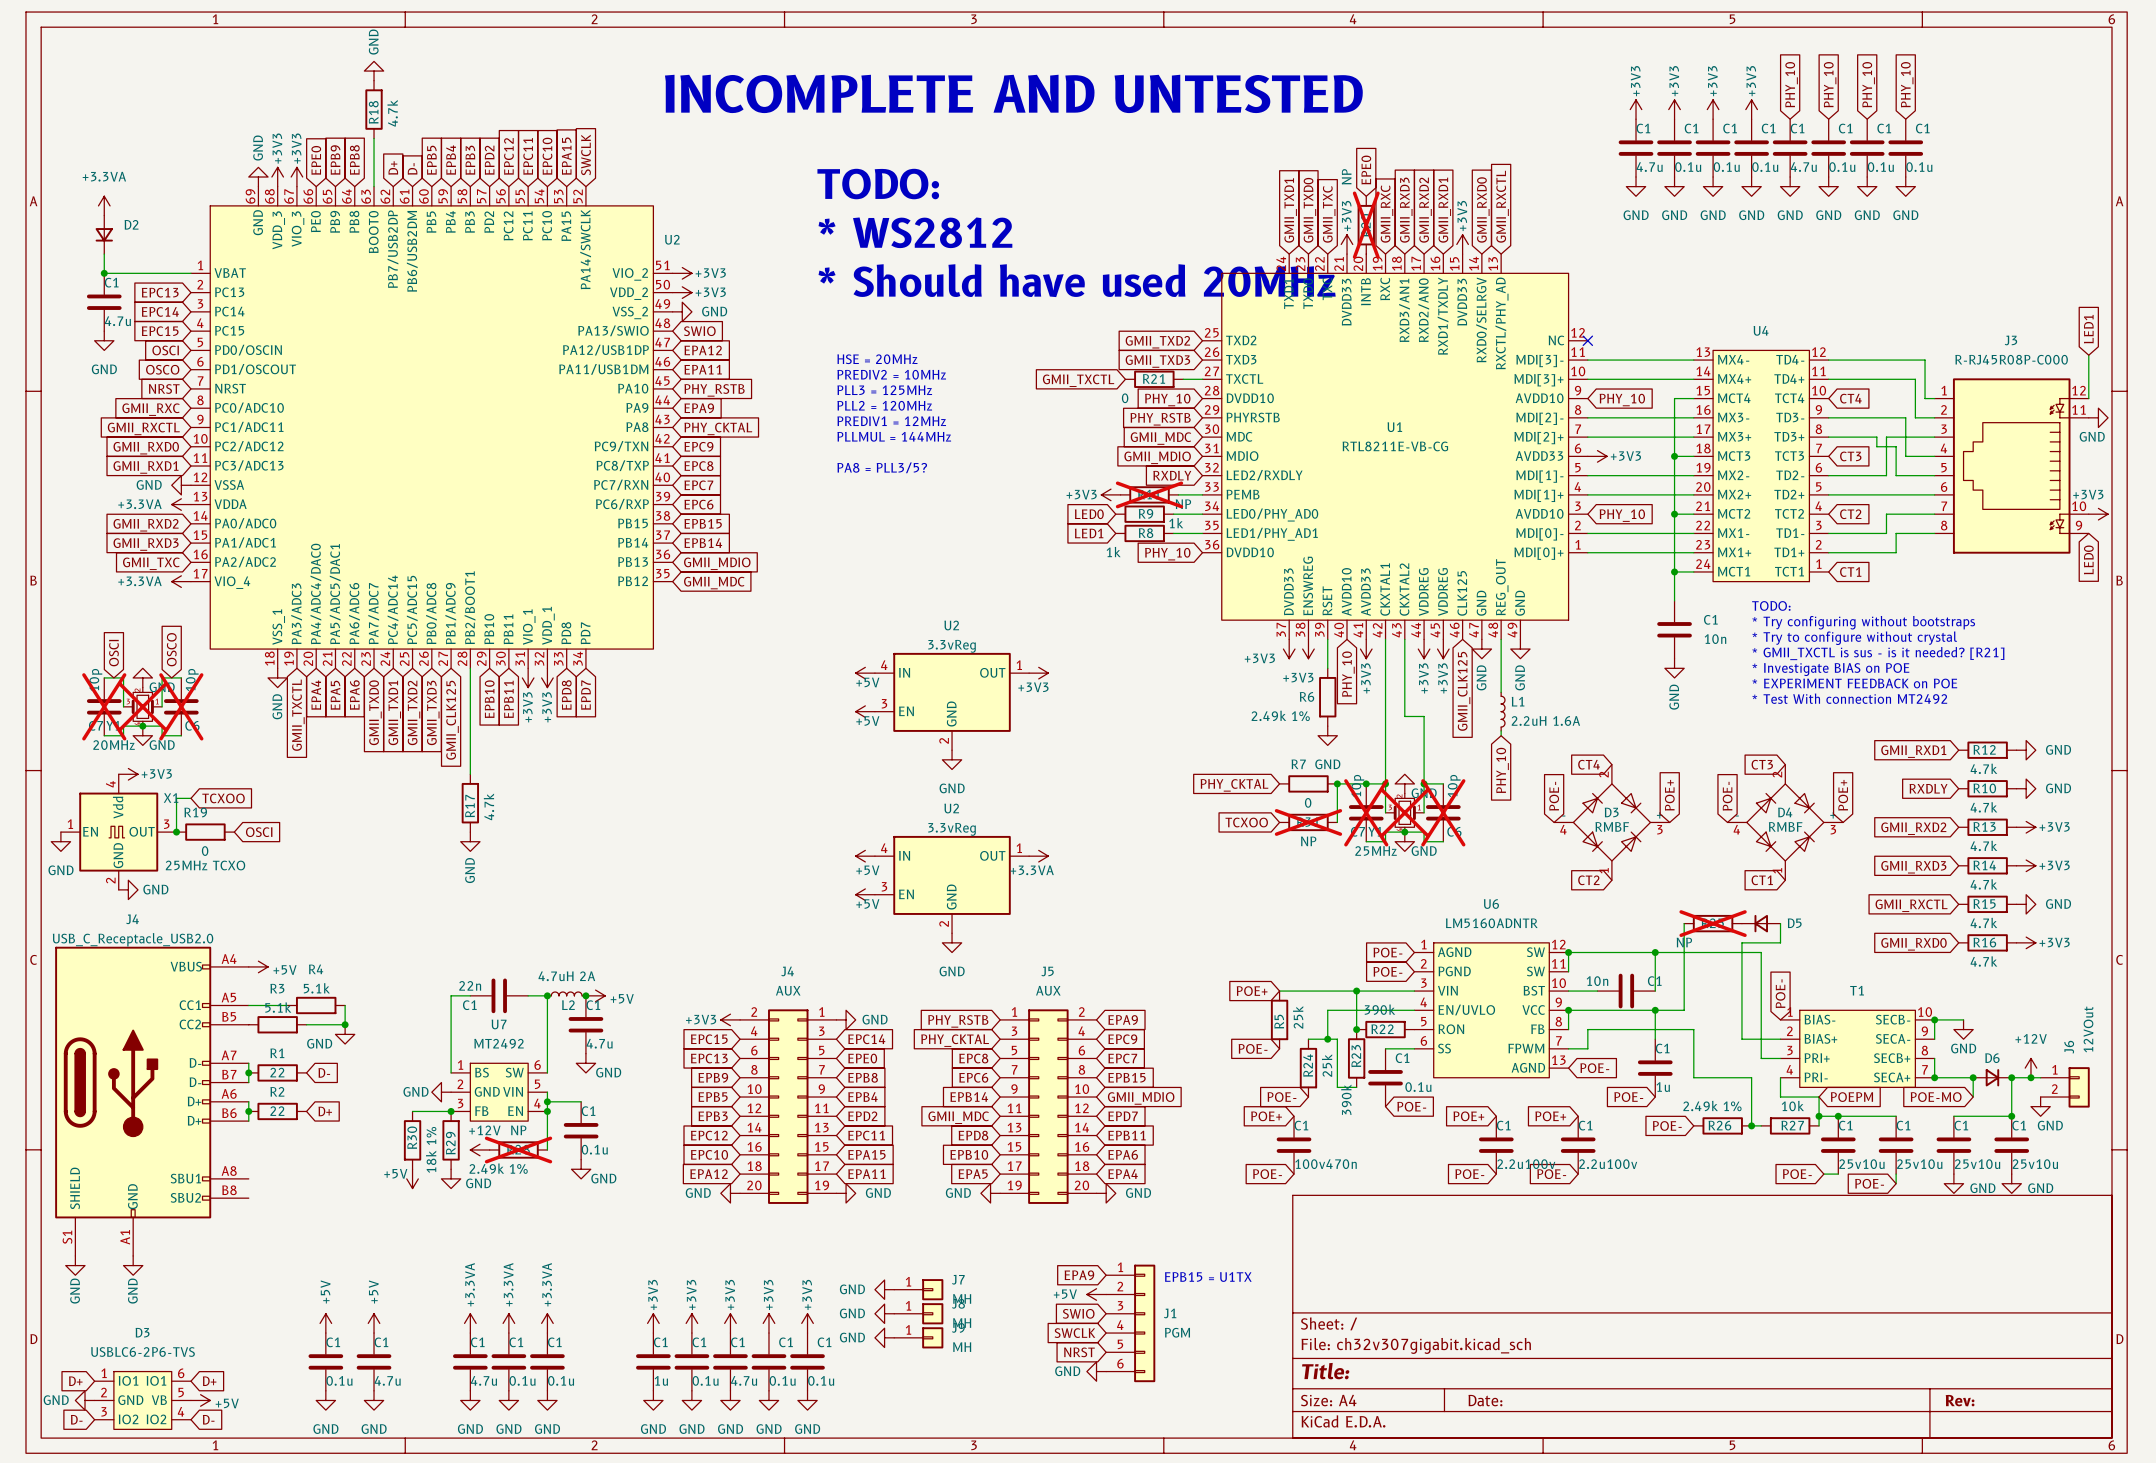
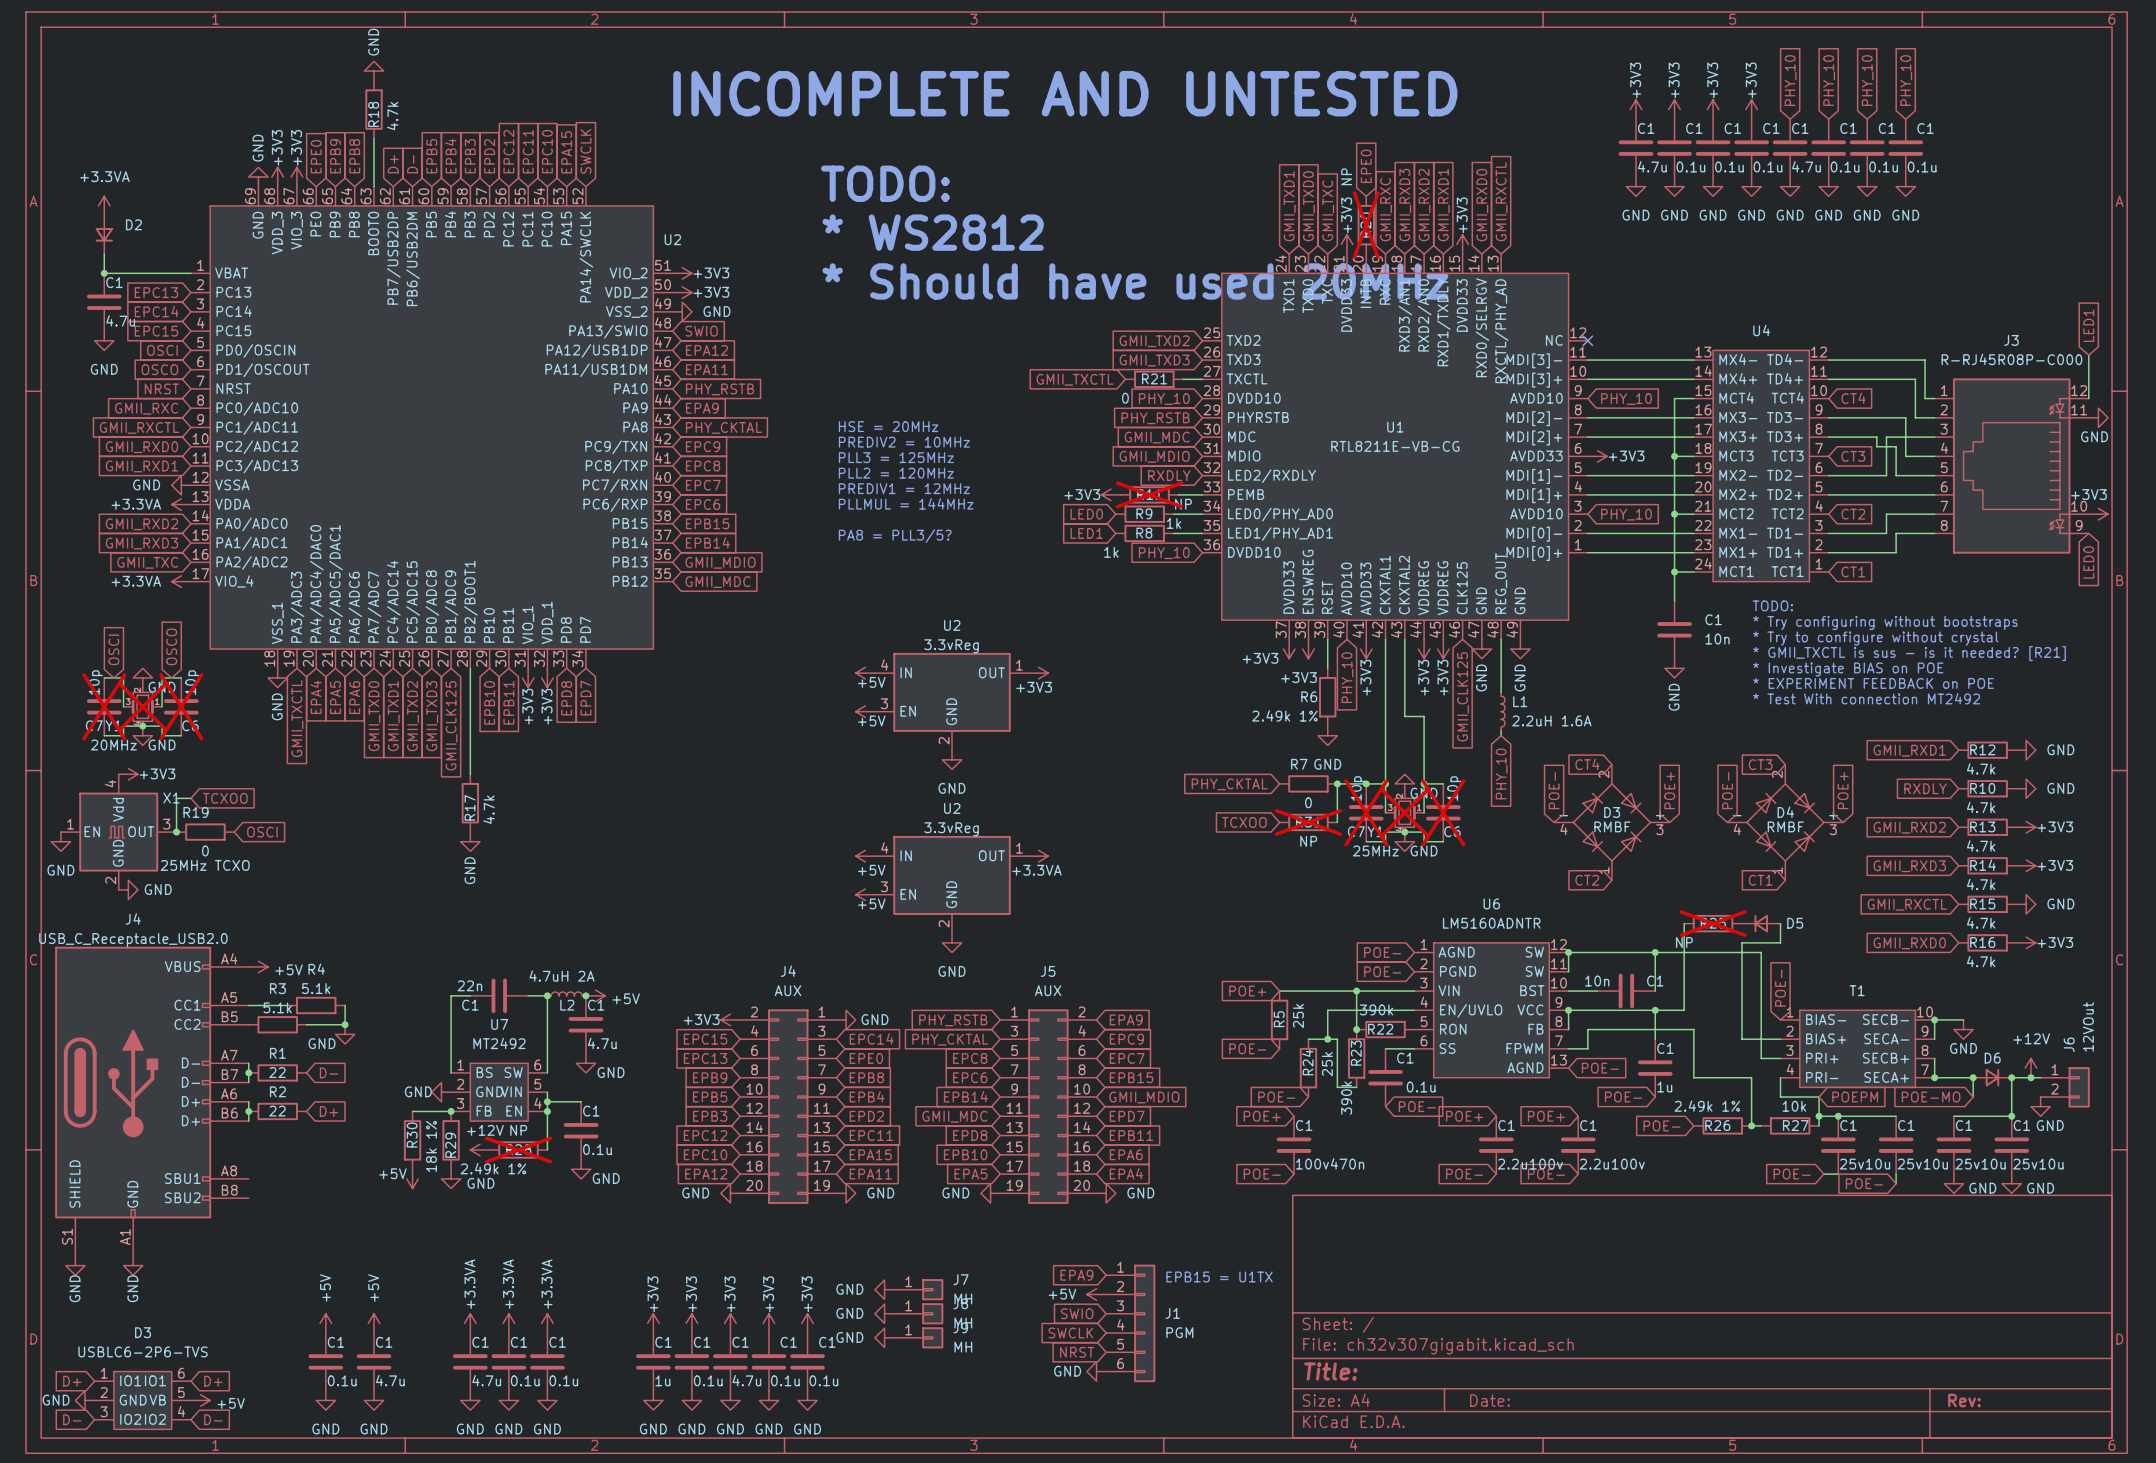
text position: HSE = 20MHz (877, 359) -> HSE = 20MHz (888, 426)
text position: PREDIV2 = 10MHz (891, 374) -> PREDIV2 = 10MHz (904, 442)
text position: PLL3 = 125MHz (884, 390) -> PLL3 = 125MHz (896, 457)
text position: PLL2 = 120MHz (884, 405) -> PLL2 = 120MHz (896, 473)
text position: PREDIV1 = 12MHz (891, 421) -> PREDIV1 = 12MHz (904, 488)
text position: PLLMUL = 144MHz (894, 436) -> PLLMUL = 144MHz (906, 503)
text position: PA8 = PLL3/5? (882, 467) -> PA8 = PLL3/5? (895, 536)

